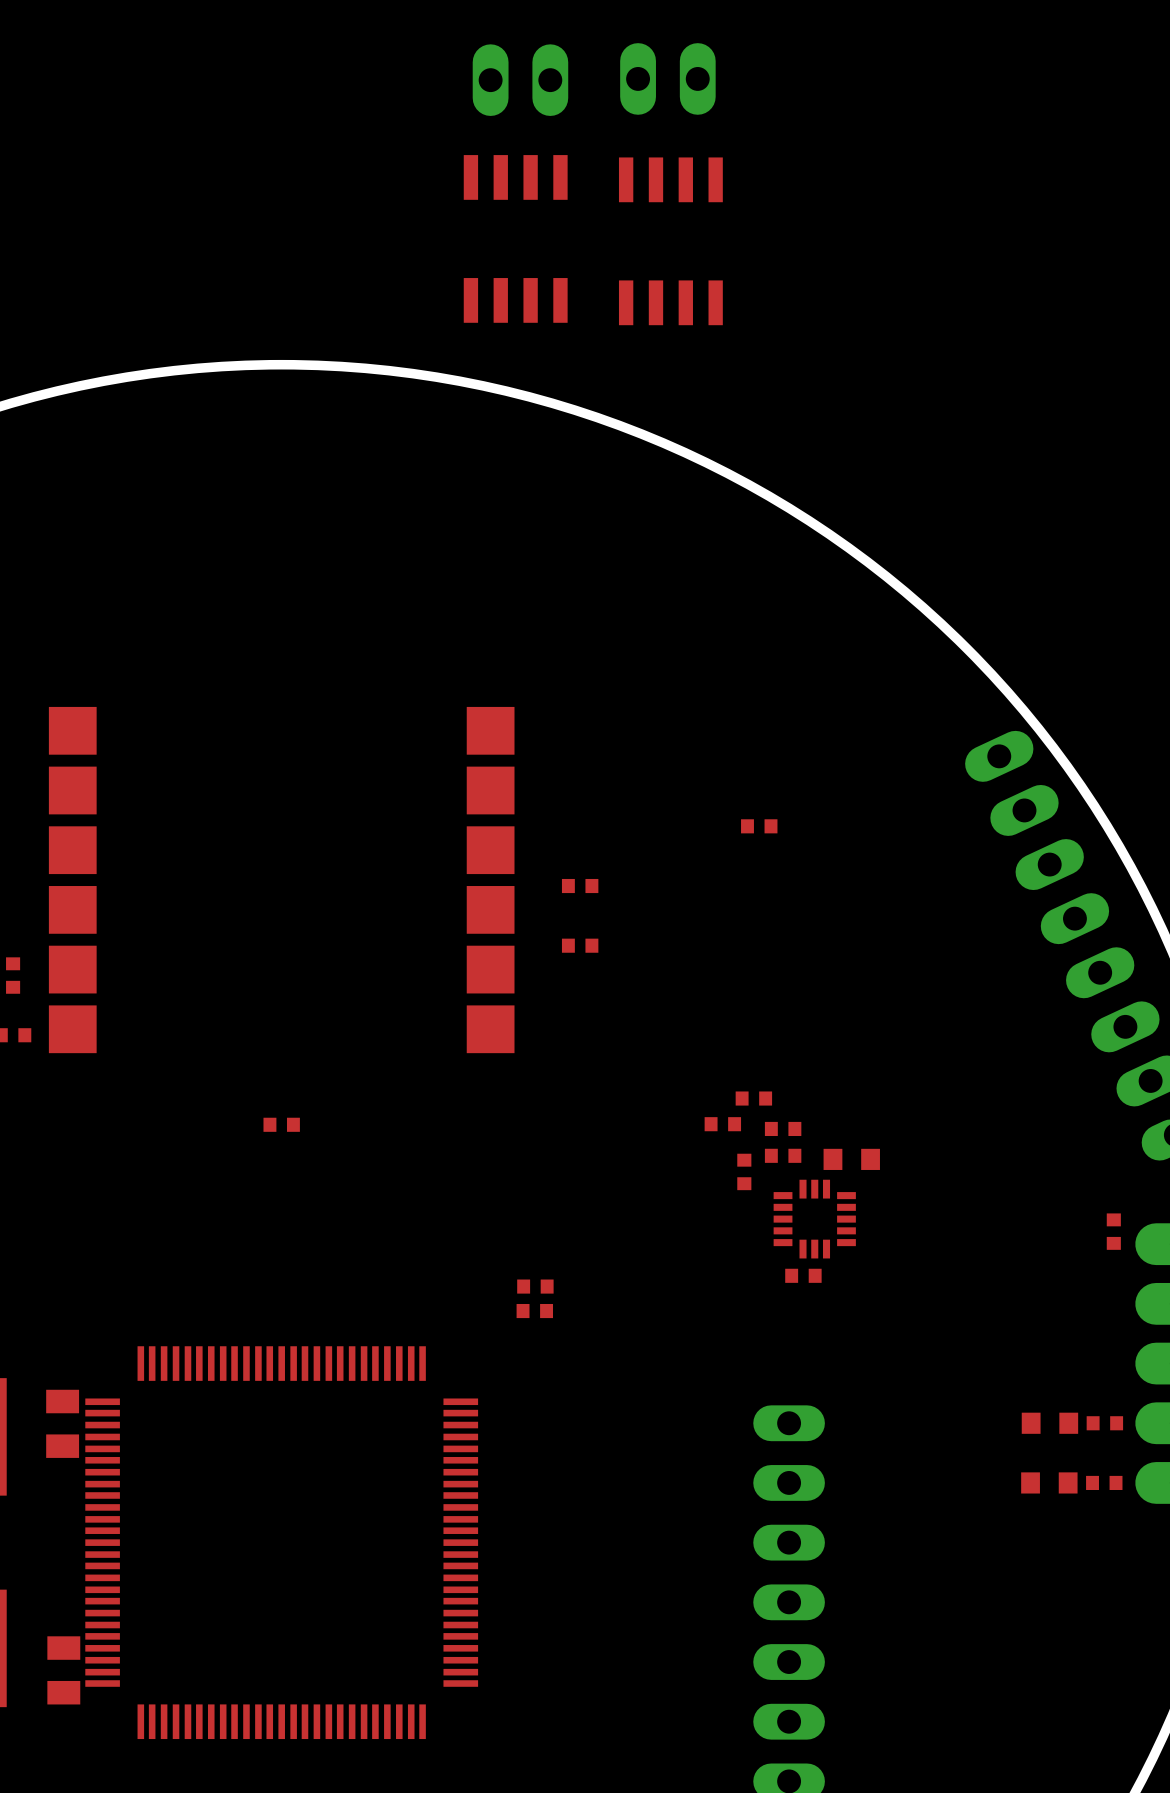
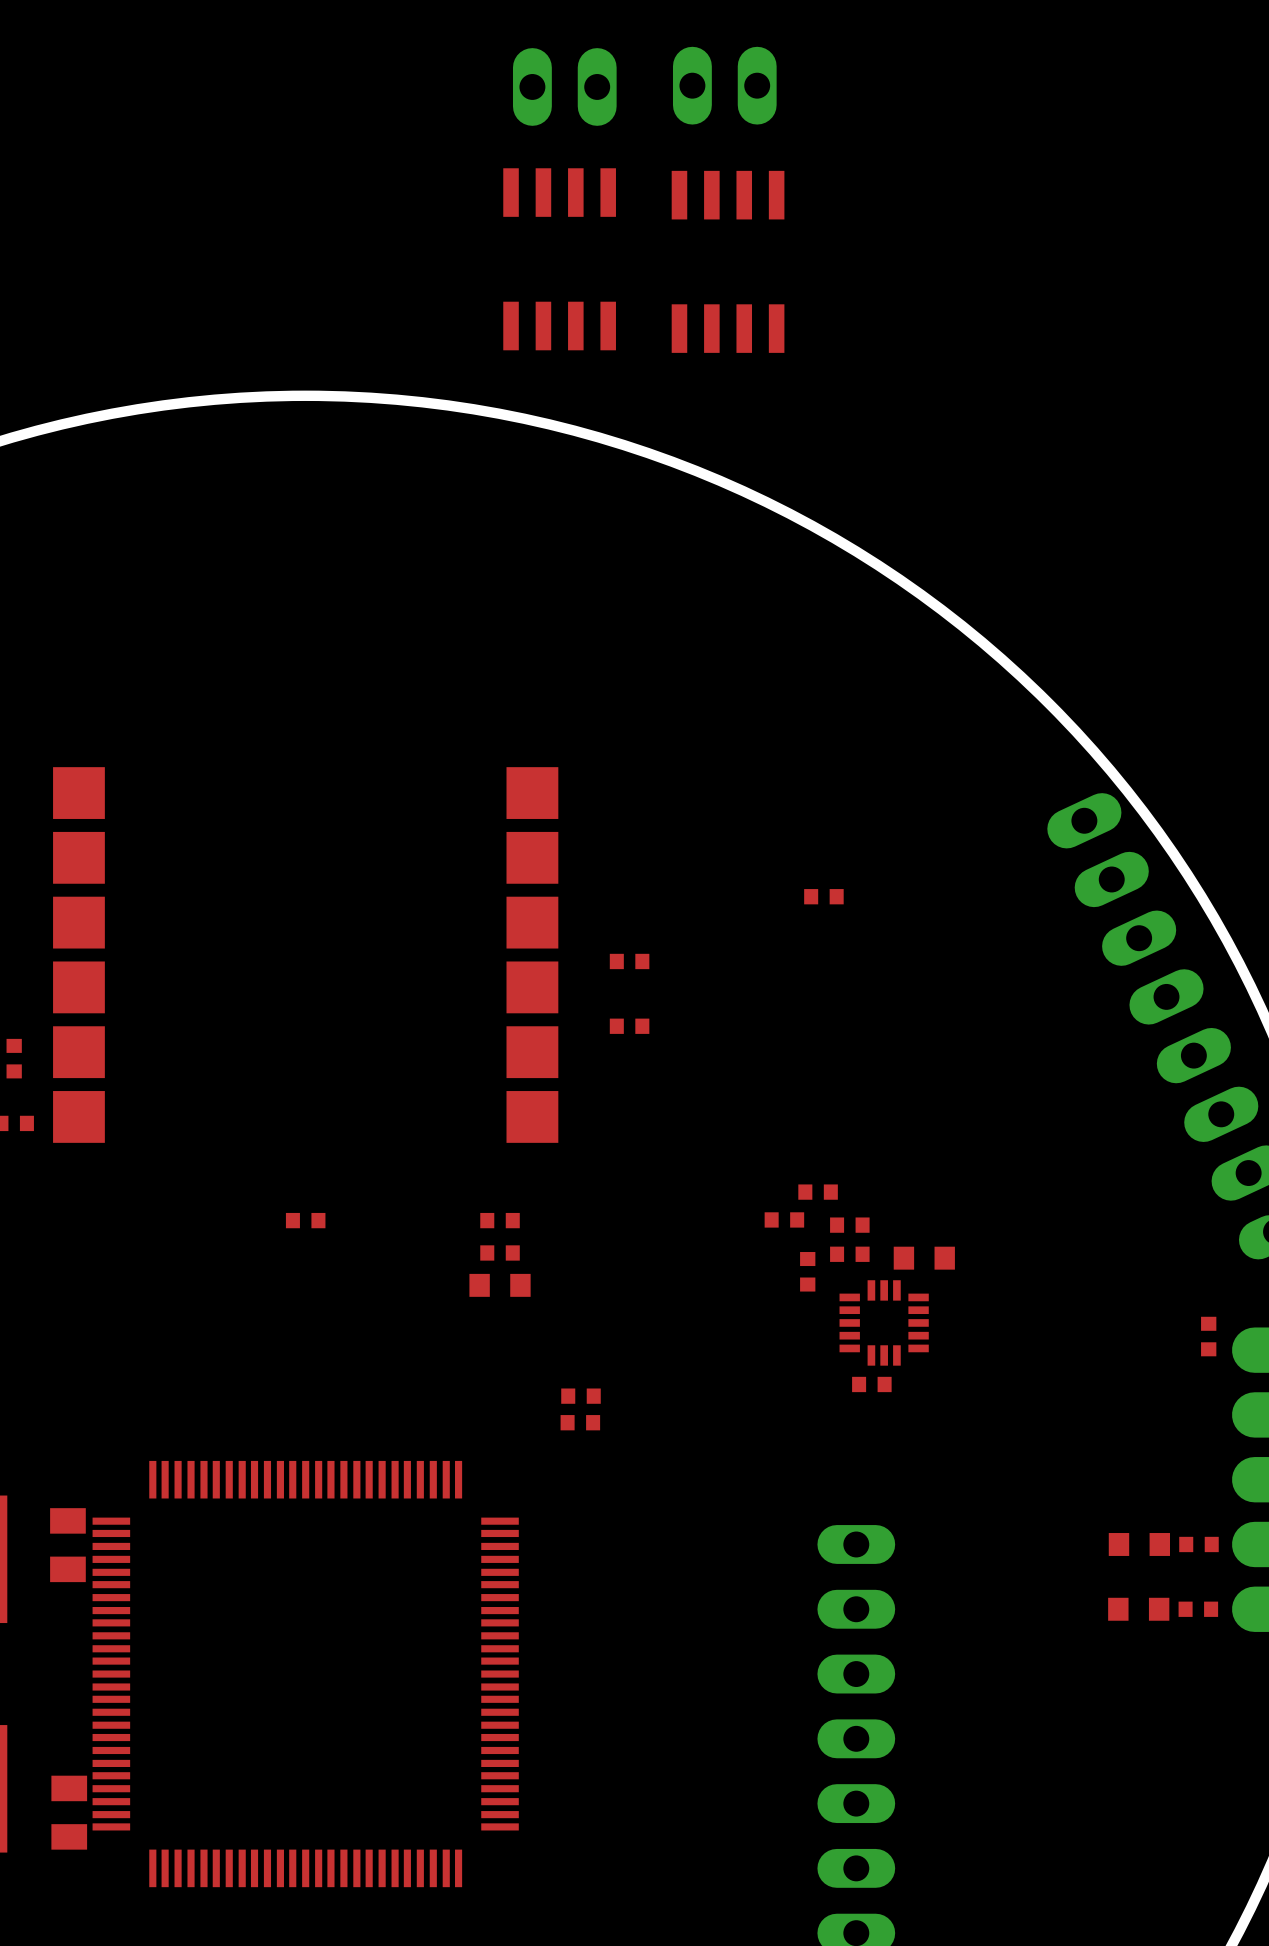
part: none -> (500, 1220)
part: none -> (500, 1252)
part: none -> (500, 1285)

